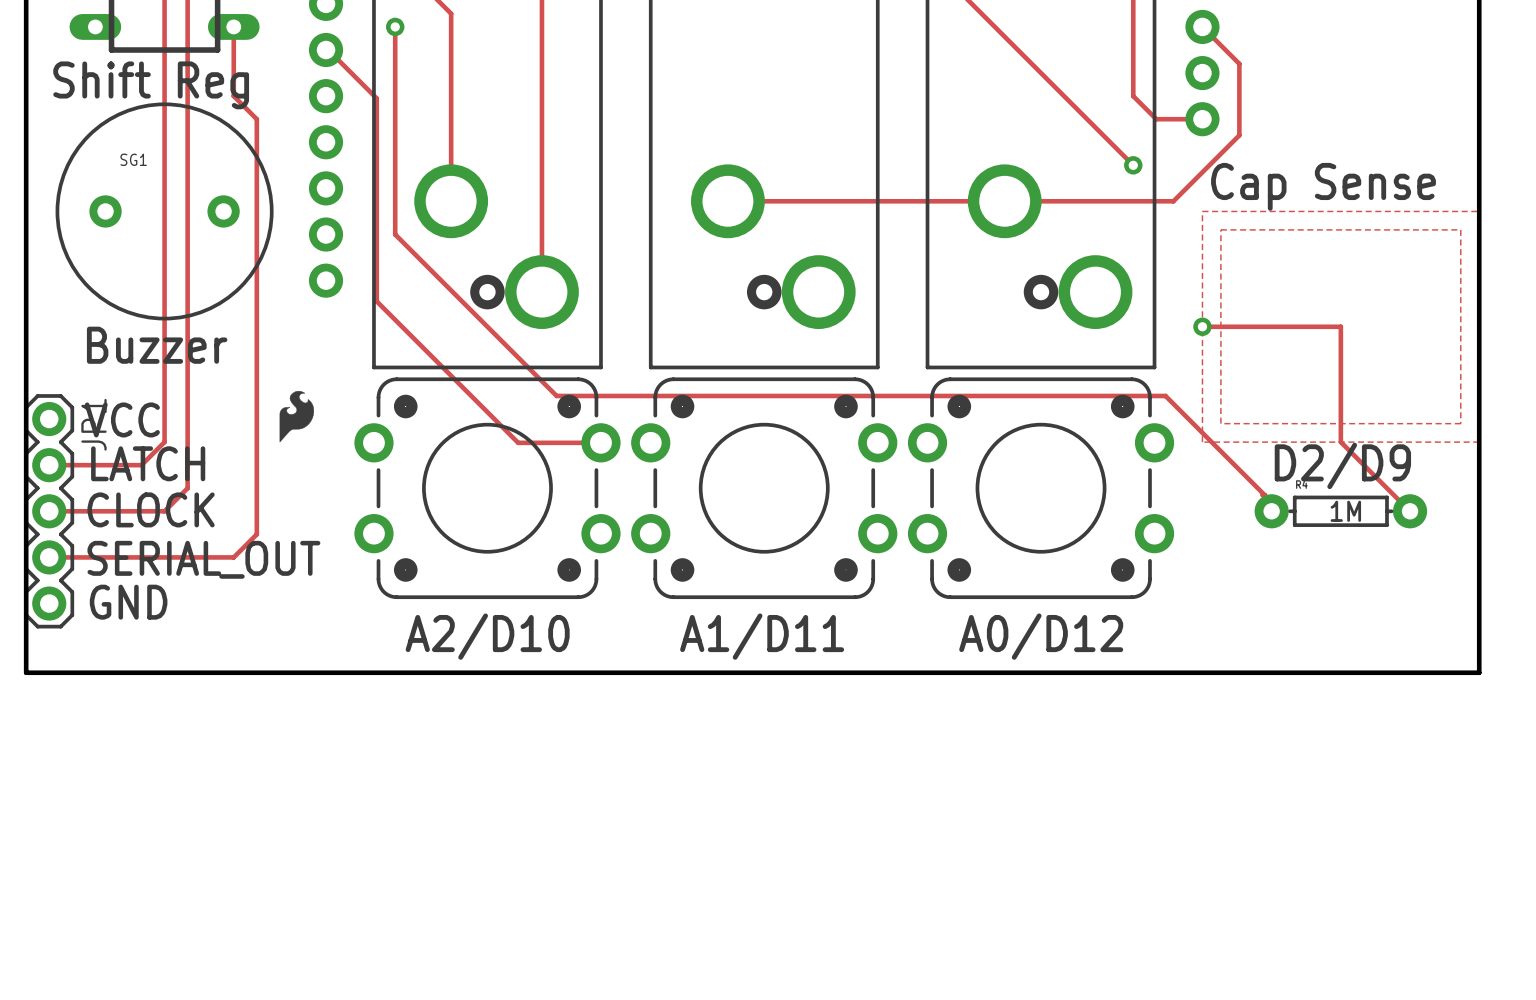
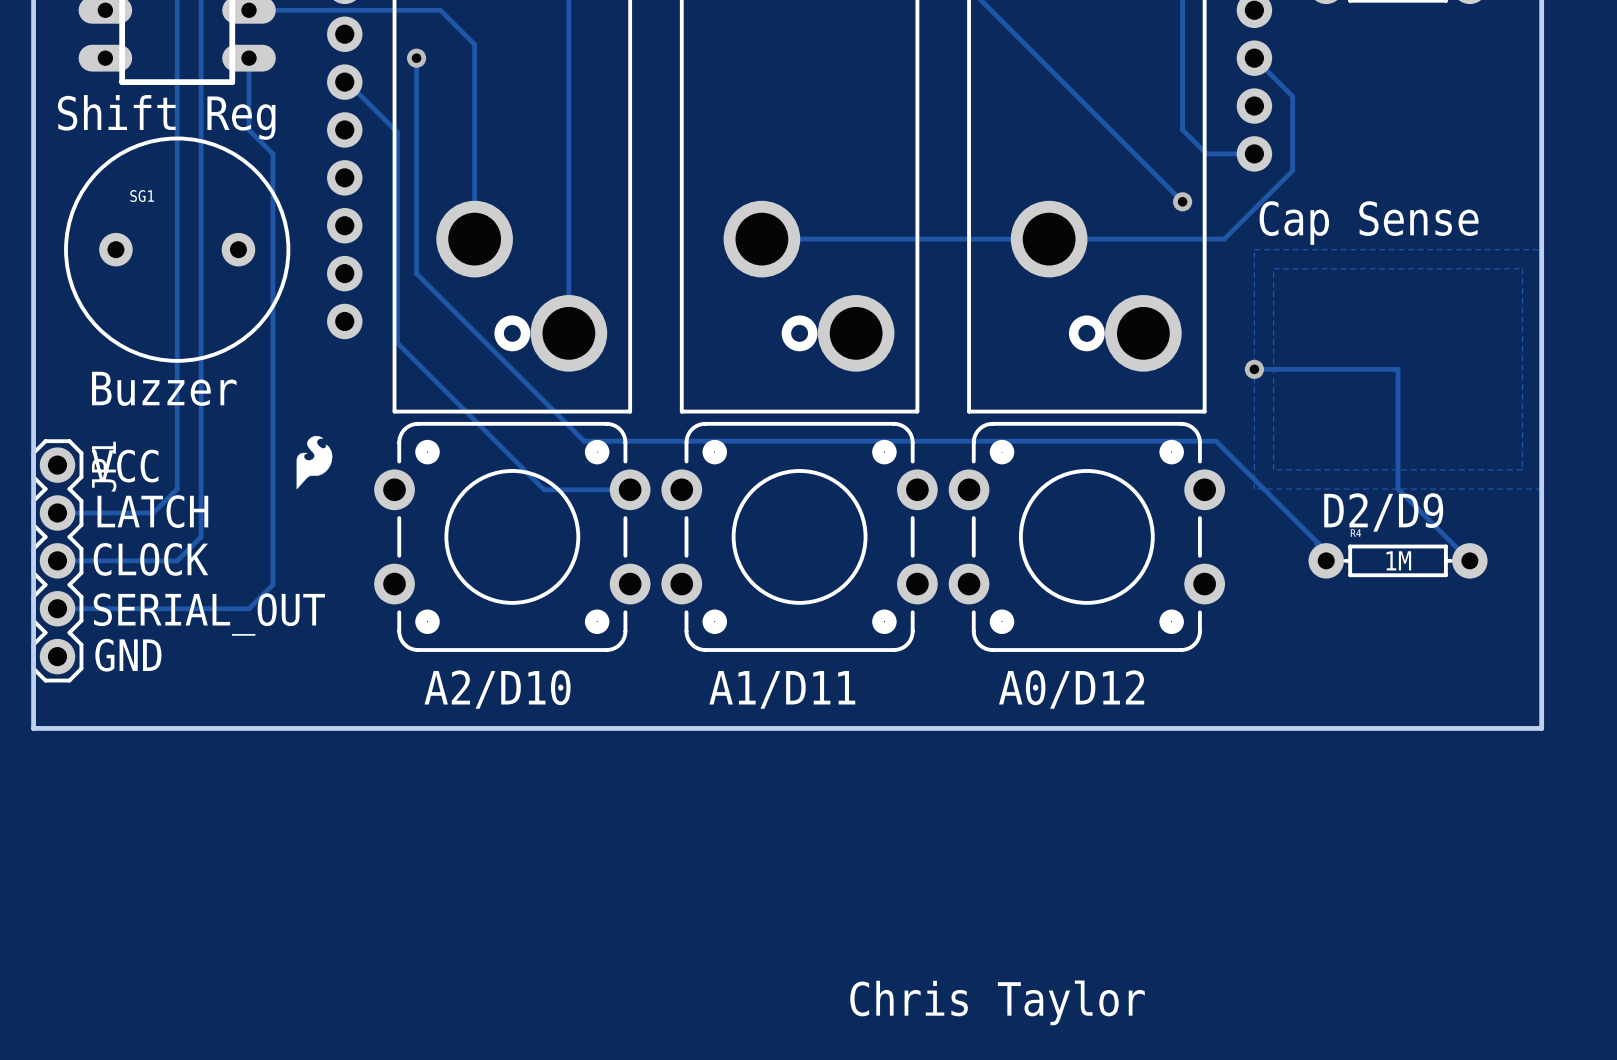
text: none -> Chris Taylor (997, 1002)

